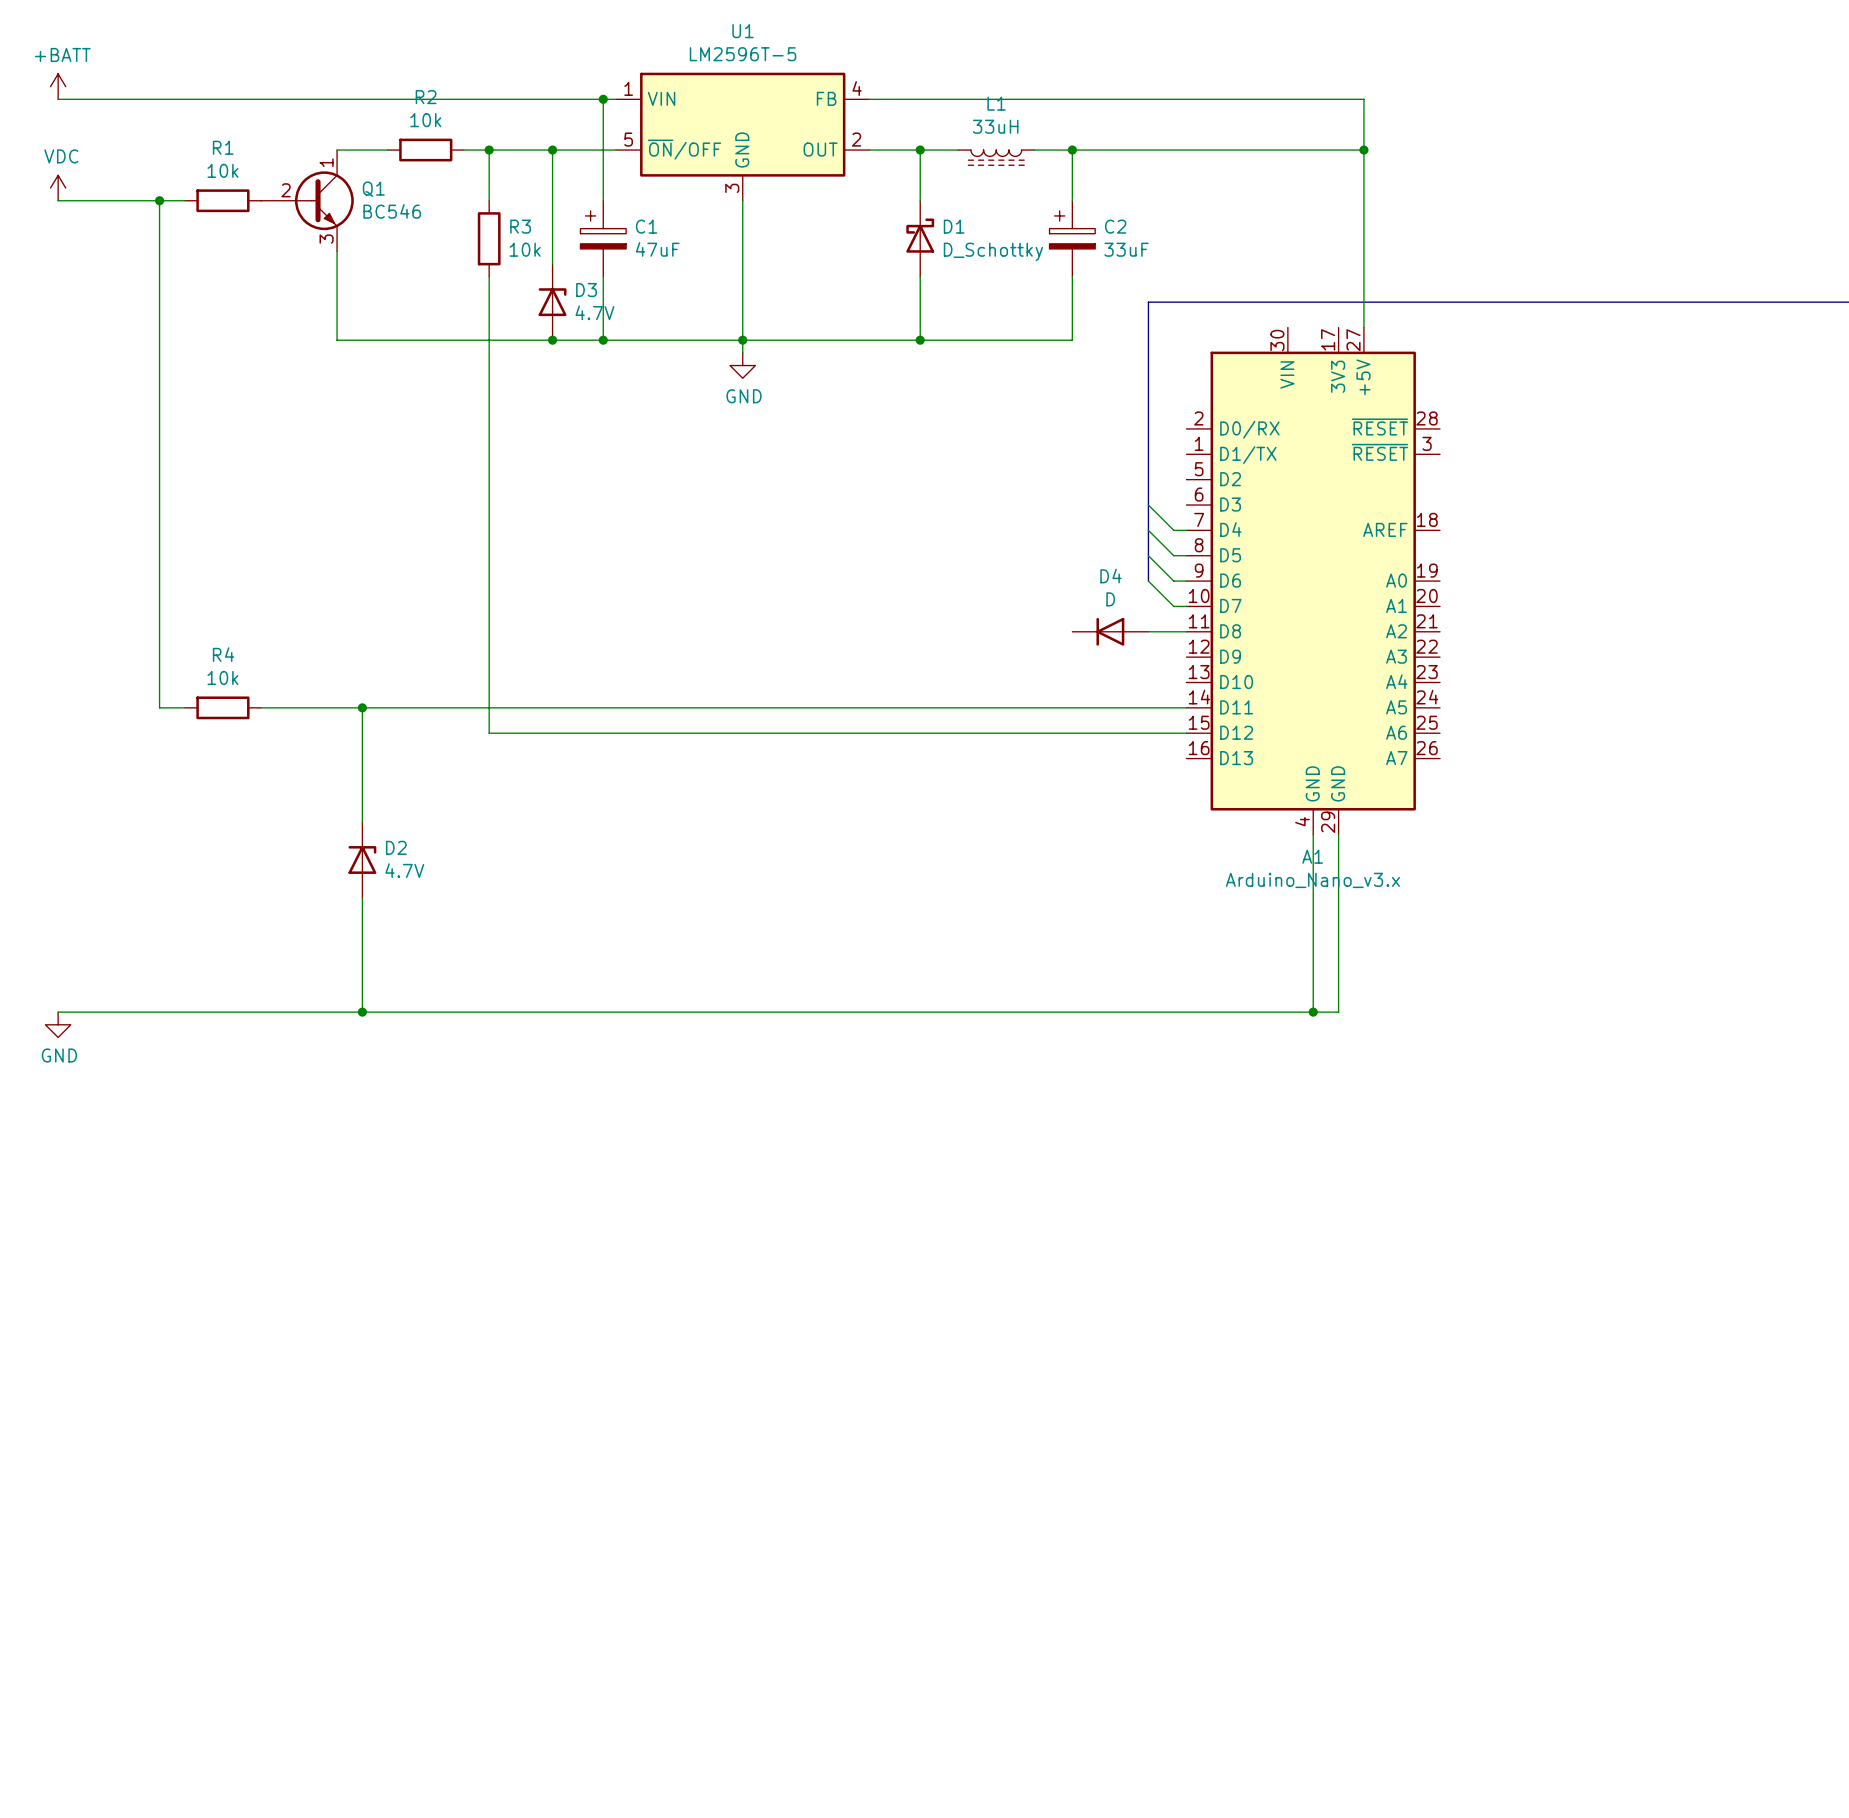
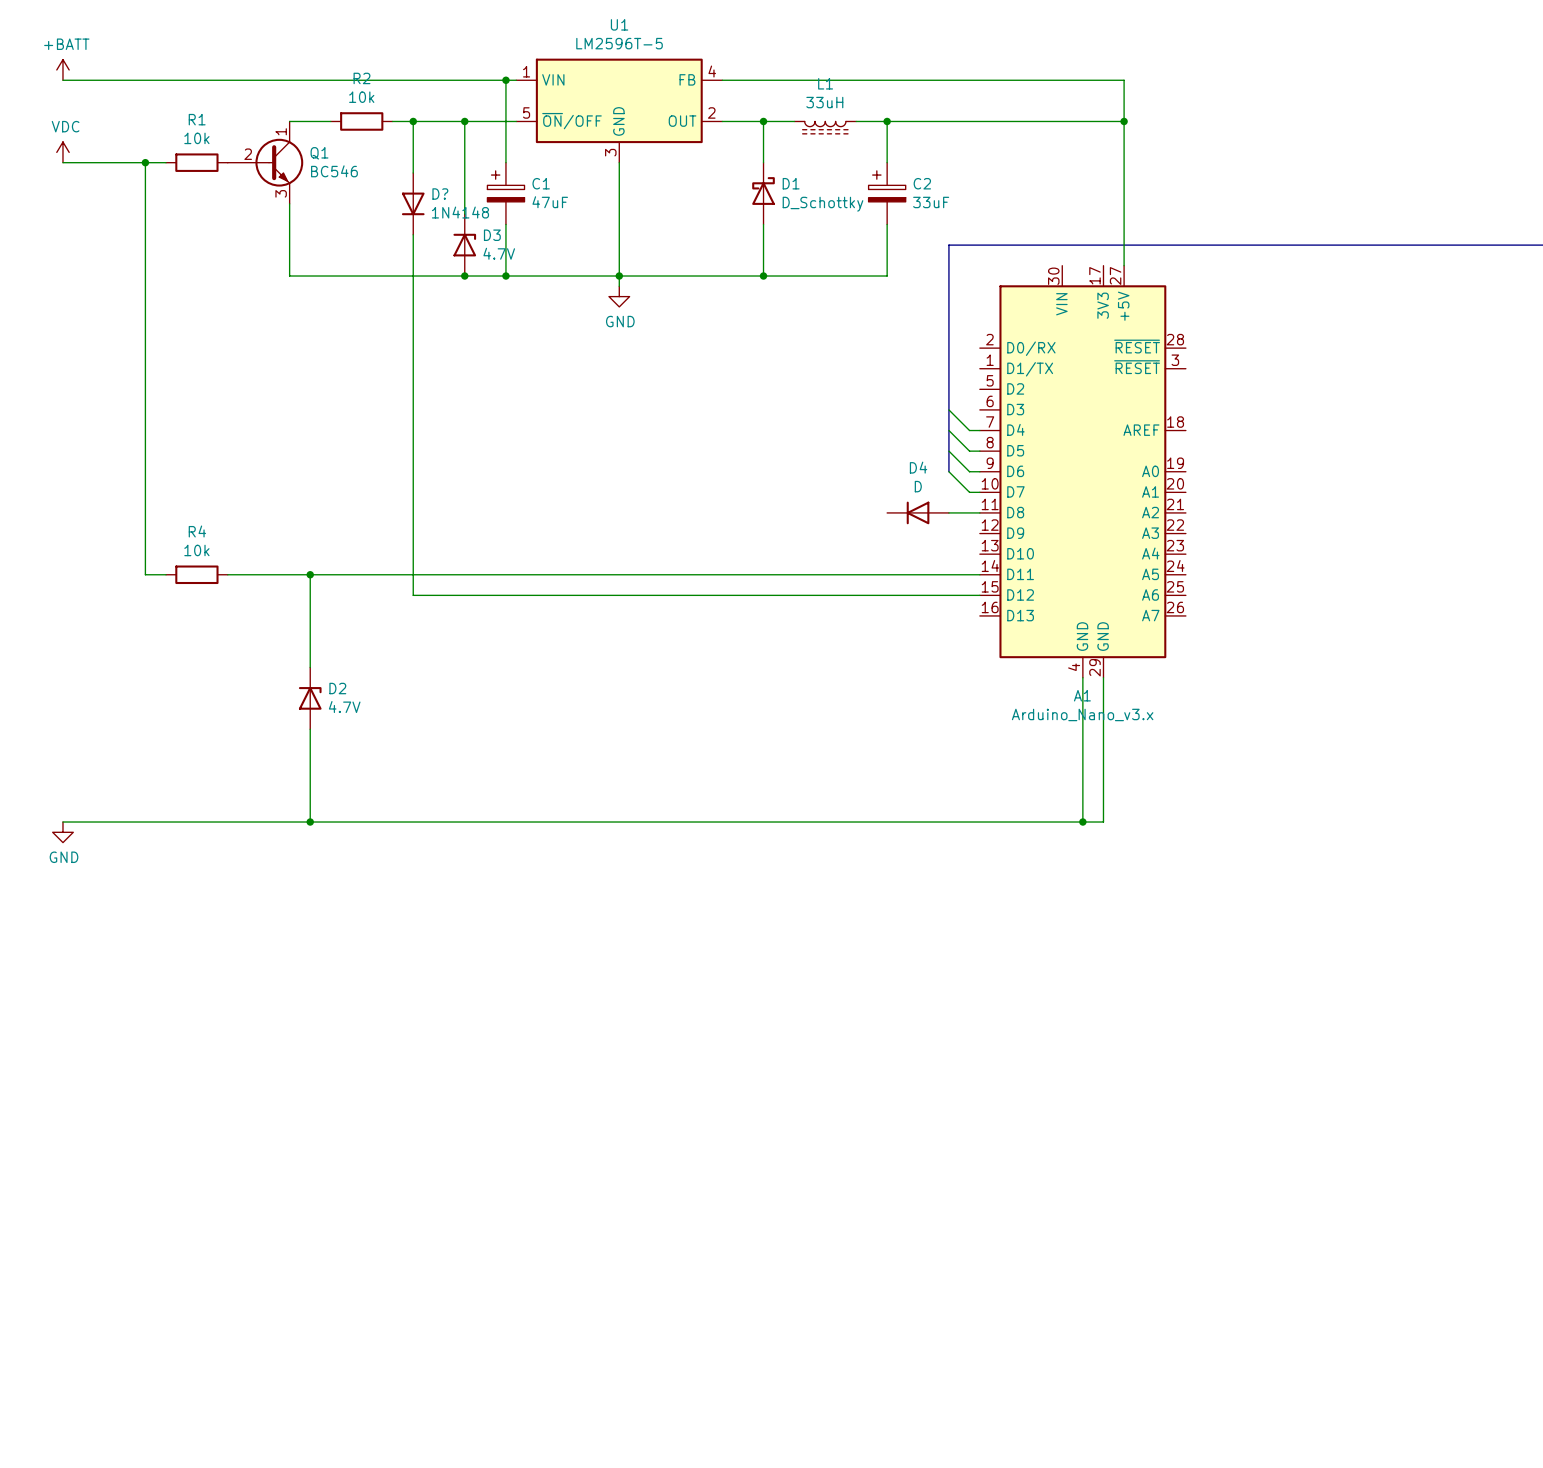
R3: 10k (489, 238) -> none
D?: none -> 1N4148 (413, 203)

